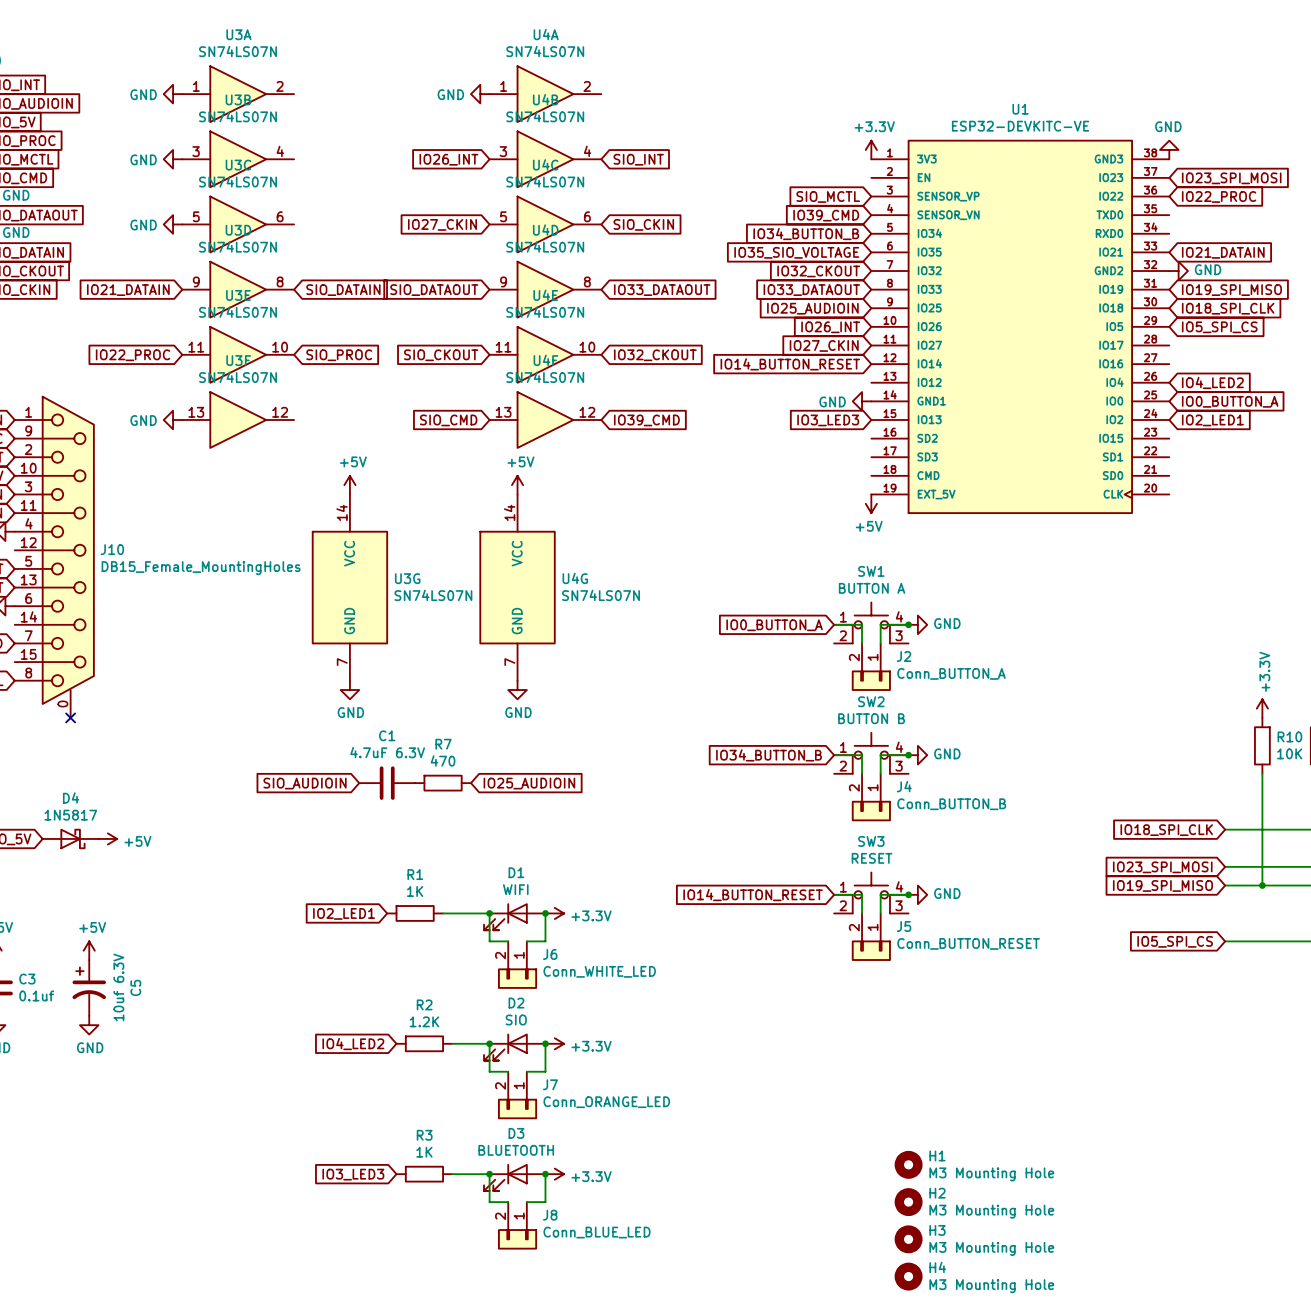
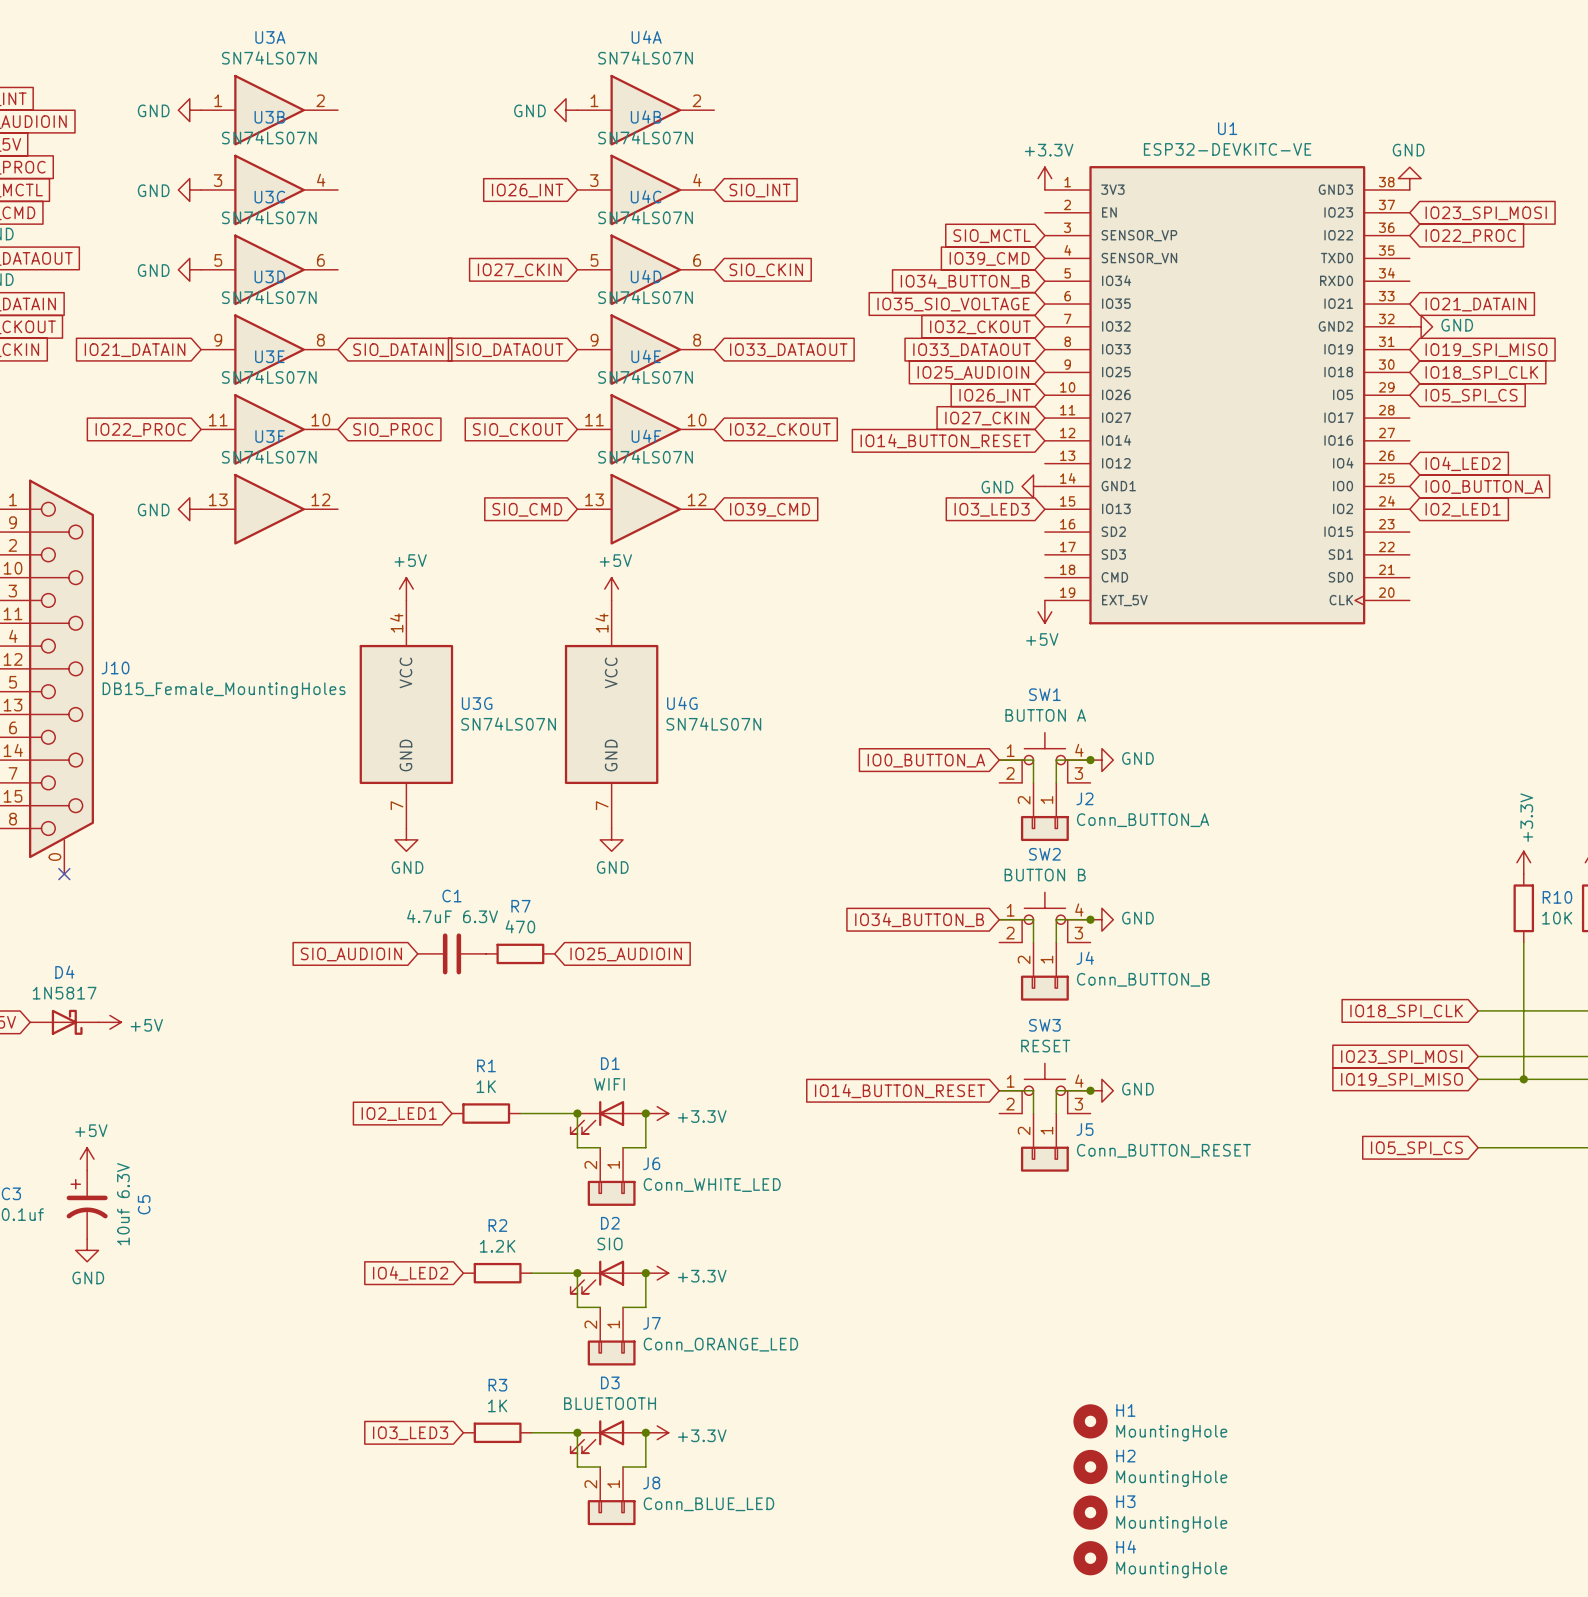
H1 value: M3 Mounting Hole (991, 1174) -> MountingHole (1171, 1433)
H2 value: M3 Mounting Hole (991, 1211) -> MountingHole (1171, 1478)
H3 value: M3 Mounting Hole (991, 1248) -> MountingHole (1171, 1524)
H4 value: M3 Mounting Hole (991, 1286) -> MountingHole (1171, 1569)

